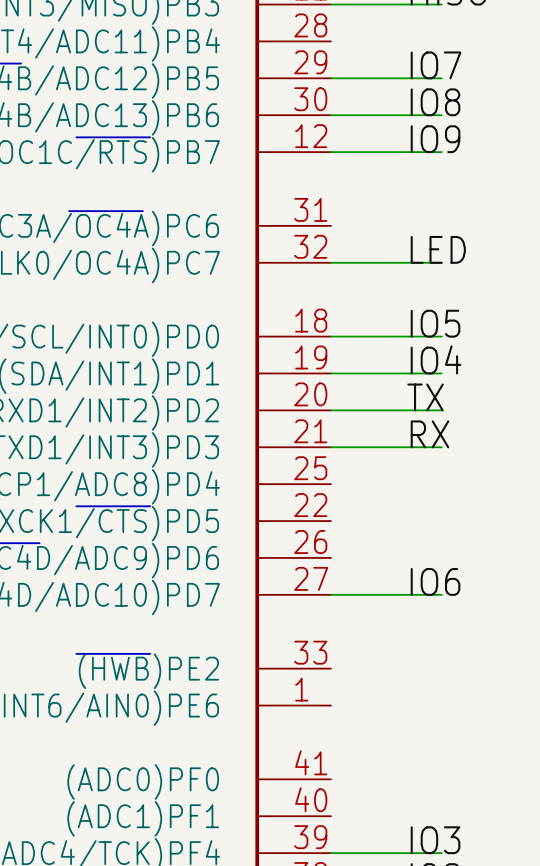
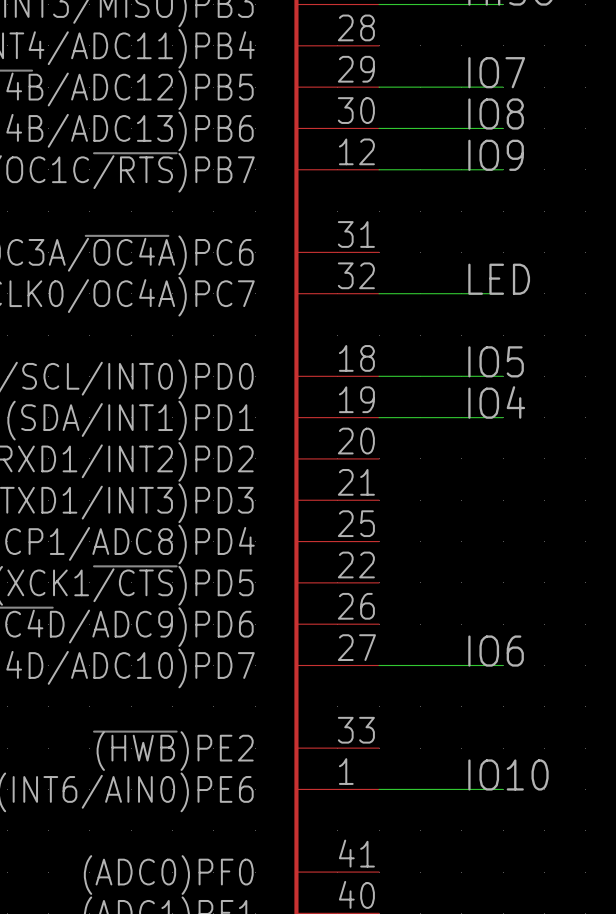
label: TX (425, 397) -> none
wire: (331, 410) (441, 410) -> none
label: RX (429, 434) -> none
wire: (331, 447) (441, 447) -> (379, 789) (503, 789)
label: none -> IO10 (508, 774)

